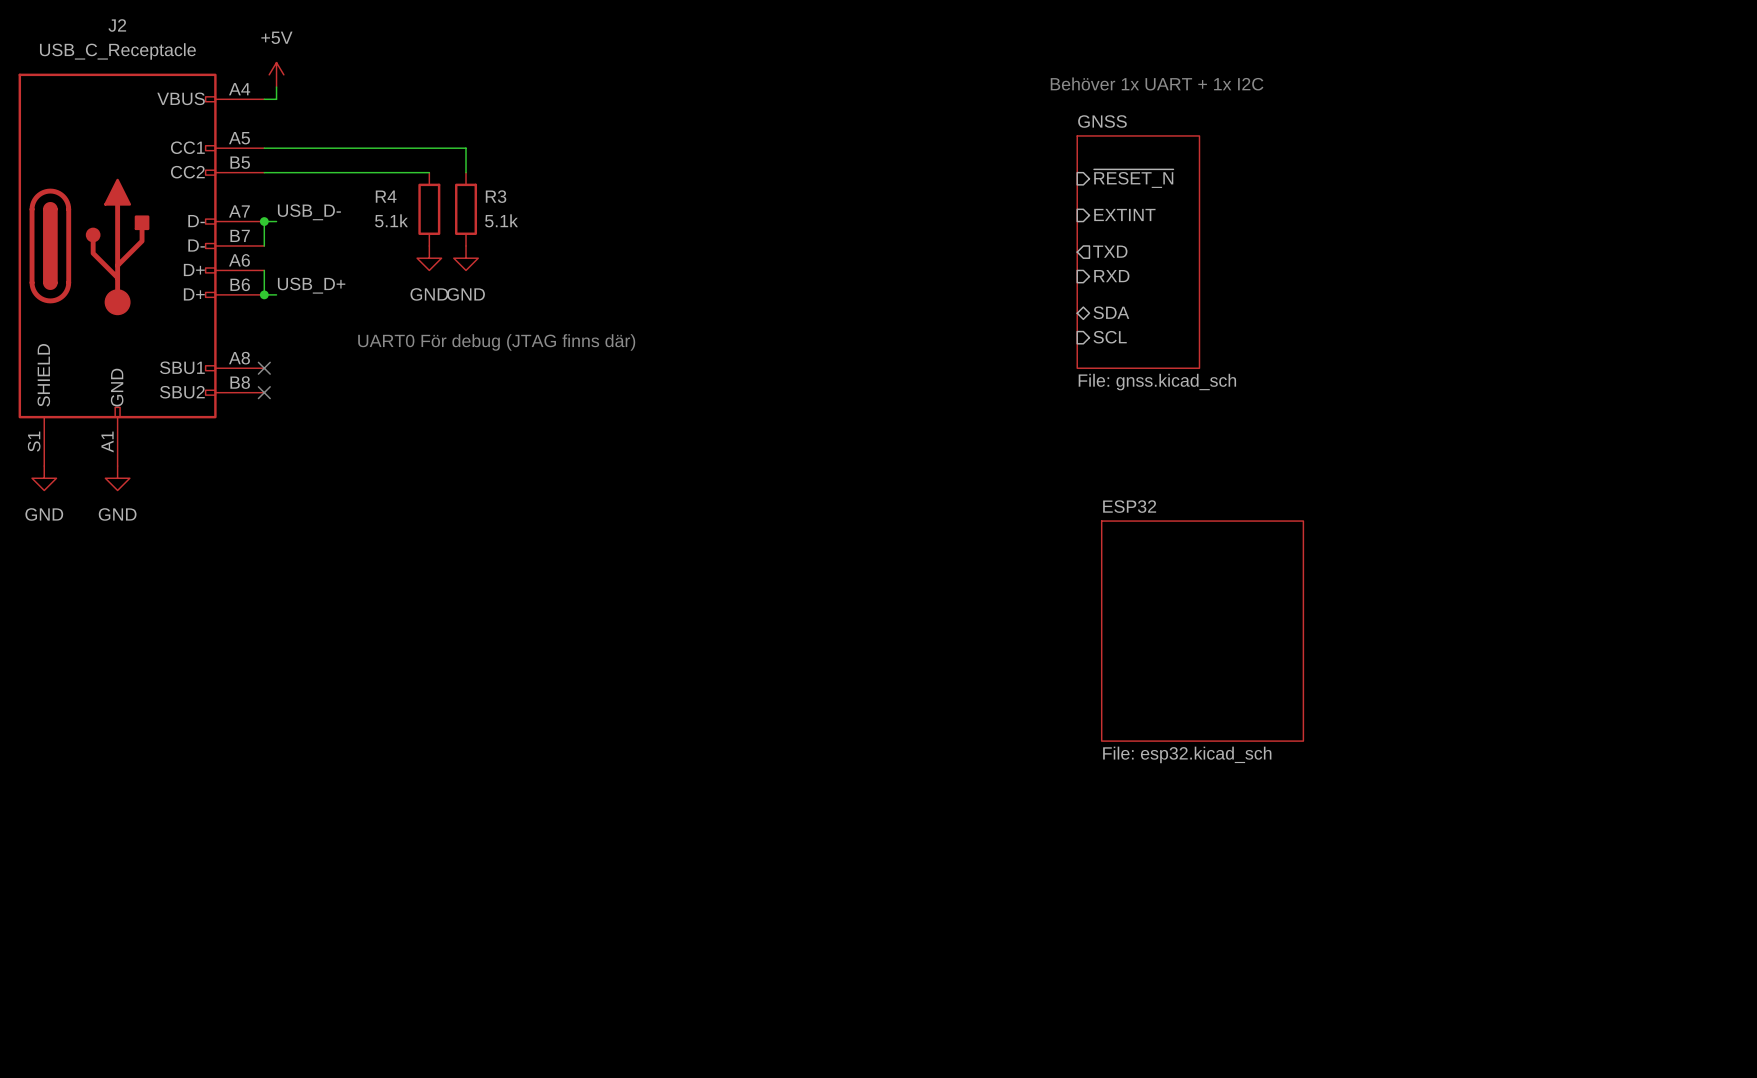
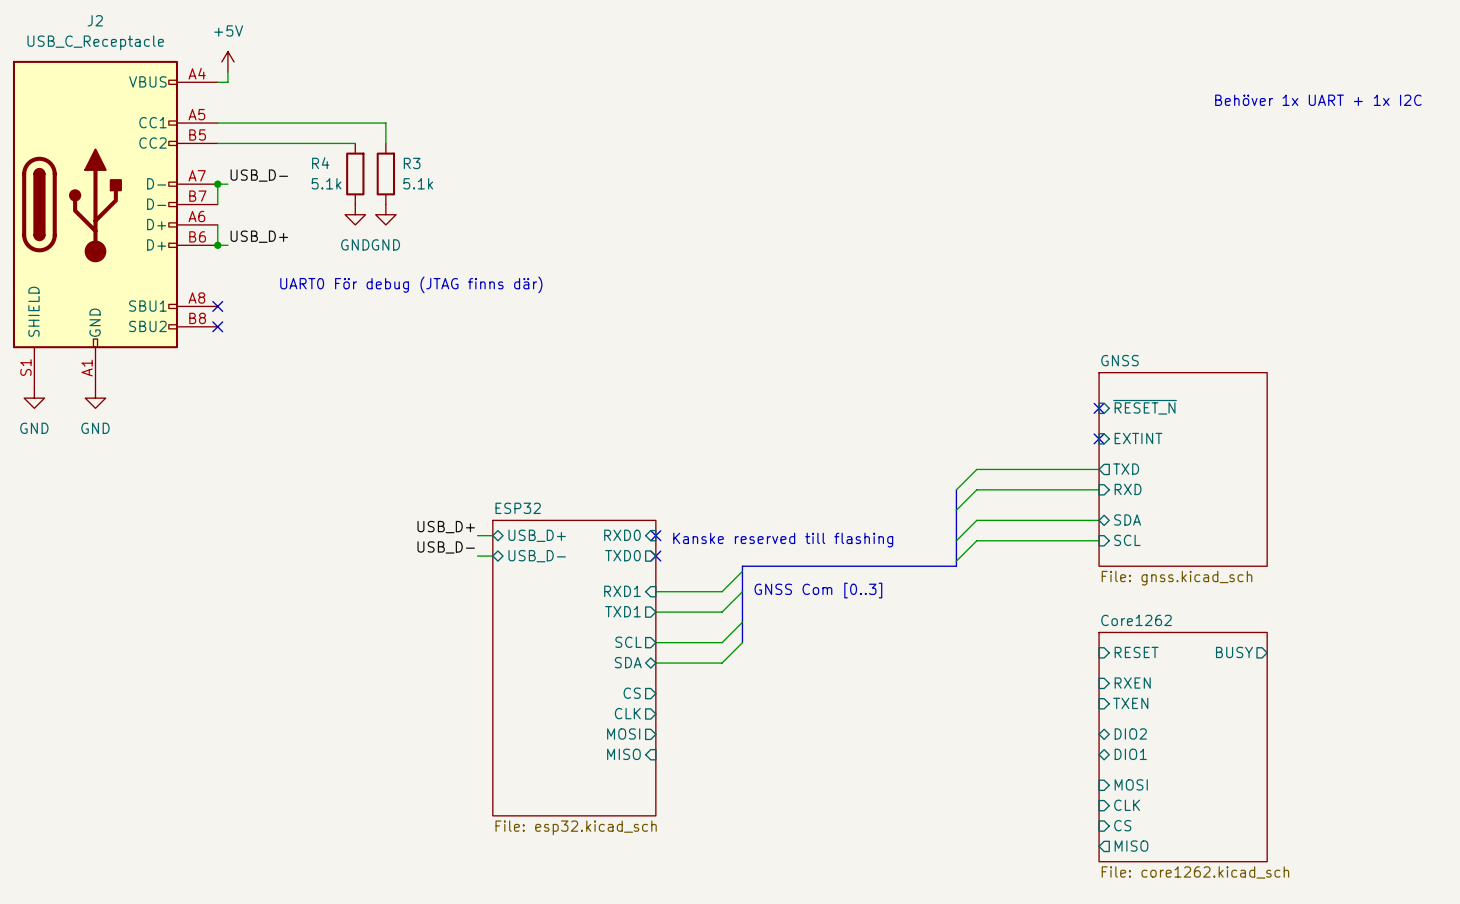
text: Behöver 1x UART + 1x I2C (1157, 83) -> none
text: none -> Behöver 1x UART + 1x I2C (1318, 100)
sheet pin: ~{RESET_N} (1133, 178) -> none
sheet pin: EXTINT (1124, 214) -> none
sheet pin: TXD (1110, 251) -> none
sheet GNSS: File: gnss.kicad_sch (1138, 252) -> none
sheet pin: RXD (1111, 276) -> none
sheet pin: SDA (1111, 312) -> none
sheet pin: SCL (1110, 337) -> none
no-connect mark: none -> (1099, 408)
sheet pin: none -> ~{RESET_N} (1145, 407)
sheet ESP32 name position: ESP32 (1129, 506) -> ESP32 (518, 508)
sheet ESP32 shape: [1100, 520, 1305, 742] -> [492, 519, 657, 817]
sheet pin: none -> EXTINT (1138, 438)
no-connect mark: none -> (1099, 438)
wire: none -> (1099, 469) (976, 469) (956, 489)
sheet pin: none -> TXD (1126, 469)
sheet GNSS: none -> File: gnss.kicad_sch (1183, 469)
sheet pin: none -> RXD (1128, 489)
bus: none -> (956, 489) (956, 566) (742, 566) (742, 642)
wire: none -> (1099, 489) (976, 489) (956, 510)
wire: none -> (1099, 520) (976, 520) (956, 540)
sheet pin: none -> SDA (1127, 520)
label: none -> USB_D+ (446, 527)
sheet pin: none -> RXD0 (622, 535)
wire: none -> (477, 535) (492, 535)
no-connect mark: none -> (655, 535)
sheet pin: none -> USB_D+ (537, 535)
text: none -> Kanske reserved till flashing (783, 540)
sheet pin: none -> SCL (1127, 540)
wire: none -> (1099, 540) (976, 540) (956, 561)
label: none -> USB_D- (446, 547)
wire: none -> (477, 556) (492, 556)
sheet pin: none -> TXD0 (622, 555)
no-connect mark: none -> (655, 556)
sheet pin: none -> USB_D- (537, 556)
wire: none -> (742, 571) (722, 591) (655, 591)
text: none -> GNSS Com [0..3] (818, 590)
sheet pin: none -> RXD1 (622, 591)
wire: none -> (742, 591) (722, 612) (655, 612)
sheet pin: none -> TXD1 (622, 611)
wire: none -> (742, 622) (722, 642) (655, 642)
sheet ESP32 value position: File: esp32.kicad_sch (1187, 754) -> File: esp32.kicad_sch (576, 827)
sheet pin: none -> SCL (628, 642)
wire: none -> (742, 642) (722, 663) (655, 663)
sheet pin: none -> RESET (1136, 652)
sheet pin: none -> BUSY (1234, 652)
sheet pin: none -> SDA (628, 662)
sheet pin: none -> RXEN (1132, 683)
sheet pin: none -> CS (632, 693)
sheet pin: none -> TXEN (1130, 703)
sheet pin: none -> CLK (627, 713)
sheet pin: none -> MOSI (623, 733)
sheet pin: none -> DIO2 (1130, 733)
sheet Core1262: none -> File: core1262.kicad_sch (1183, 747)
sheet pin: none -> MISO (623, 754)
sheet pin: none -> DIO1 (1130, 754)
sheet pin: none -> MOSI (1131, 784)
sheet pin: none -> CLK (1127, 805)
sheet pin: none -> CS (1122, 825)
sheet pin: none -> MISO (1131, 846)

